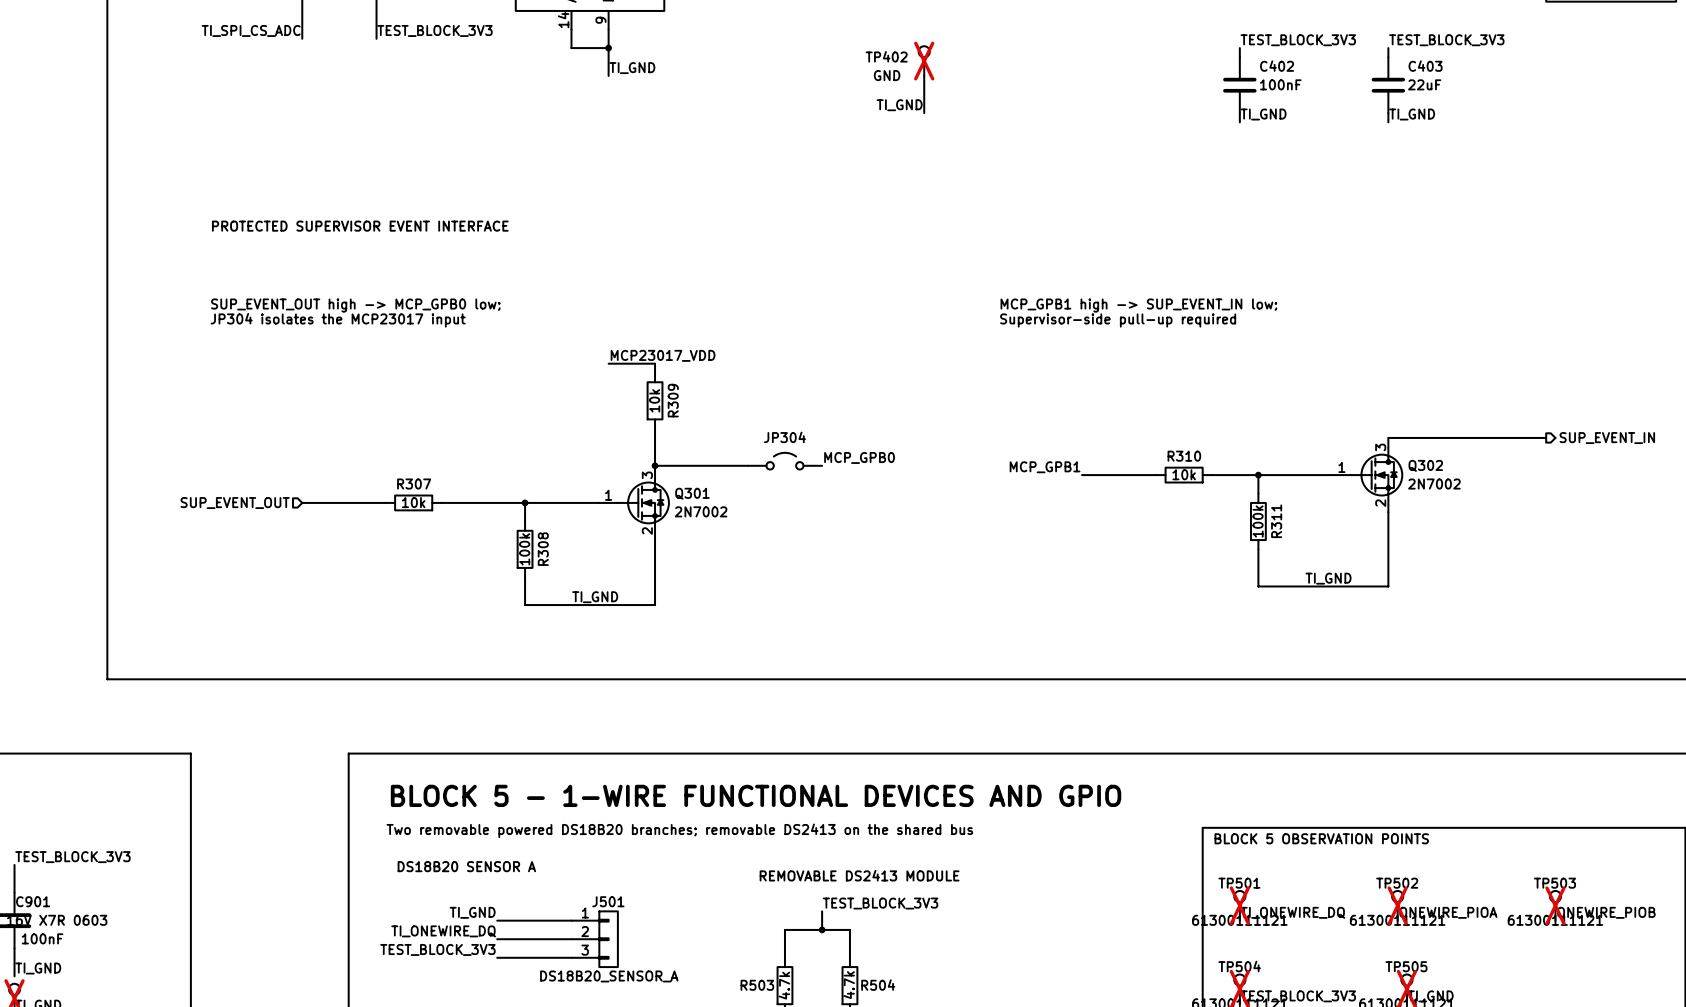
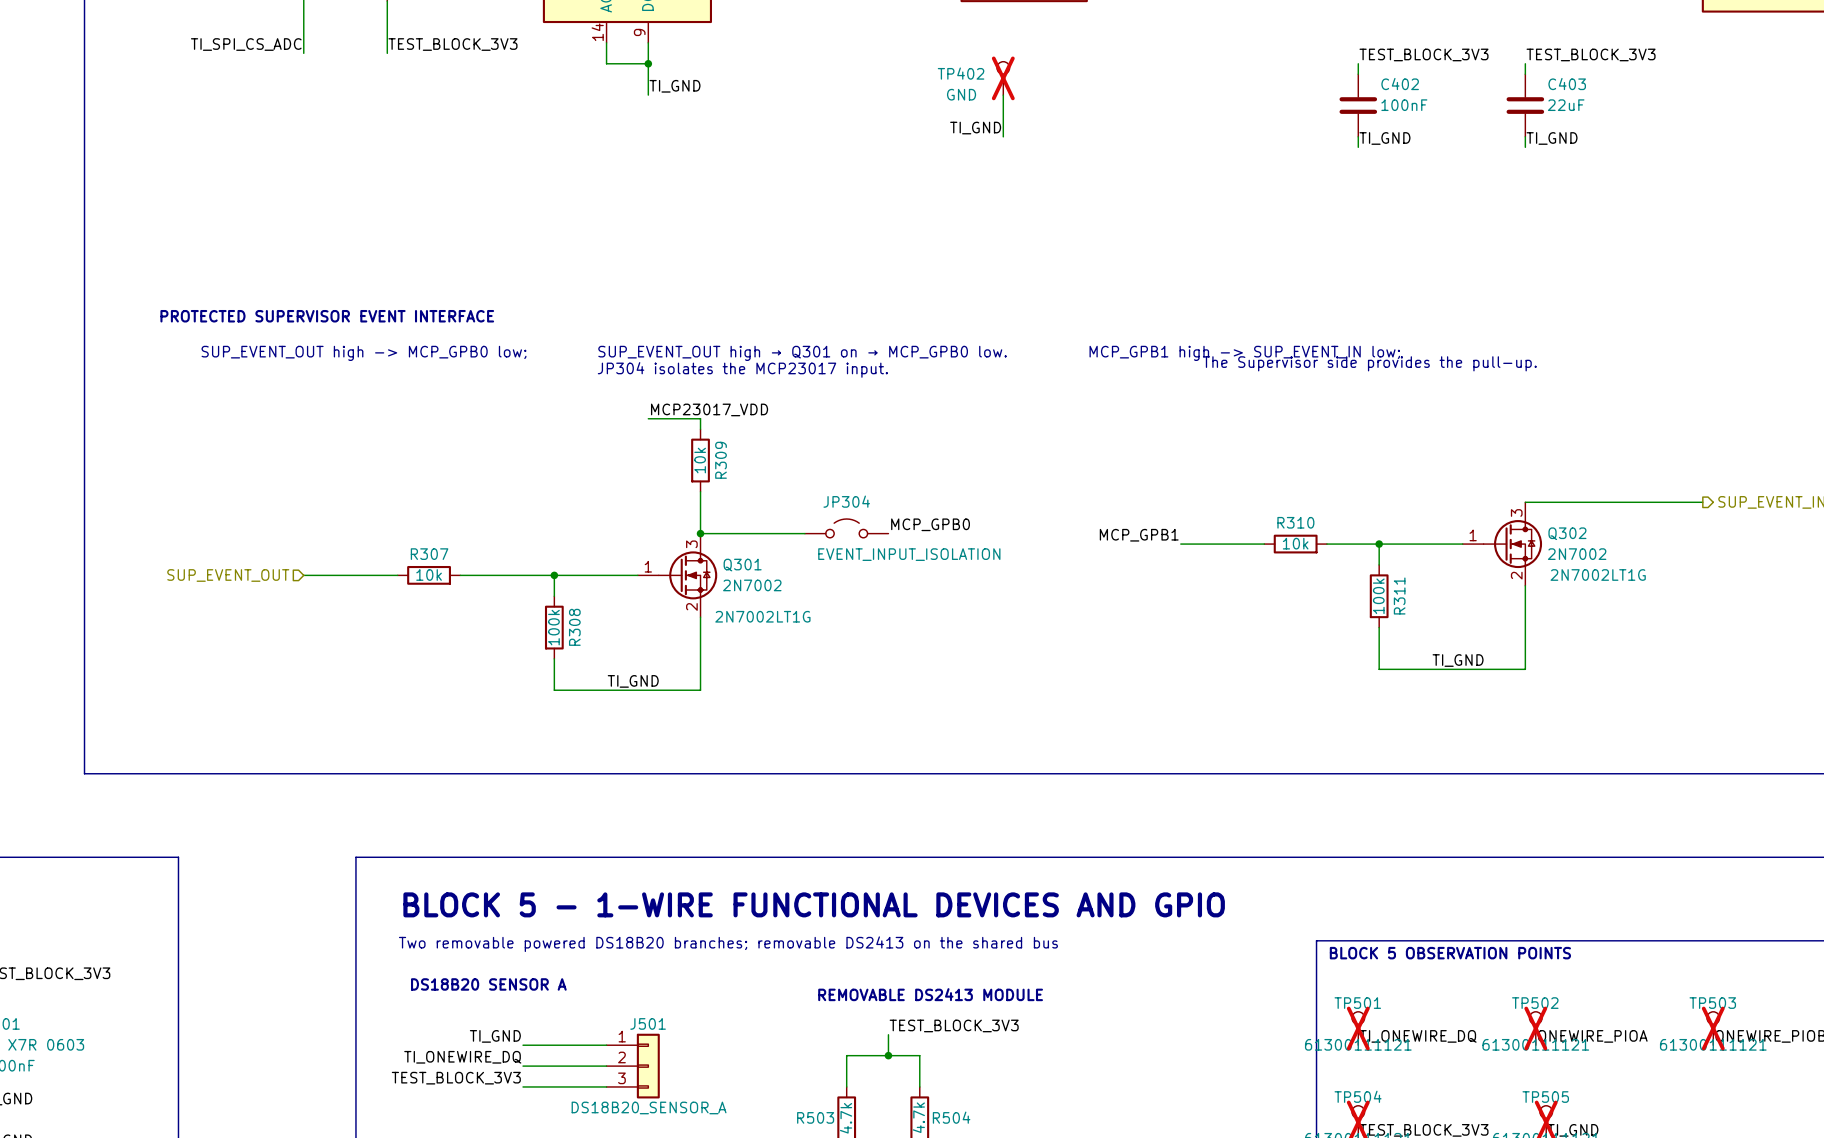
text position: PROTECTED SUPERVISOR EVENT INTERFACE (360, 226) -> PROTECTED SUPERVISOR EVENT INTERFACE (327, 316)
text: none -> SUP_EVENT_OUT high → Q301 on → MCP_GPB0 low. (802, 353)
text: JP304 isolates the MCP23017 input (338, 320) -> none
text: none -> JP304 isolates the MCP23017 input. (742, 369)
text: Supervisor-side pull-up required (1118, 320) -> The Supervisor side provides the pull-up. (1369, 363)
JP304 value: none -> EVENT_INPUT_ISOLATION (909, 554)
Q302 text: none -> 2N7002LT1G (1598, 574)
Q301 text: none -> 2N7002LT1G (762, 616)

